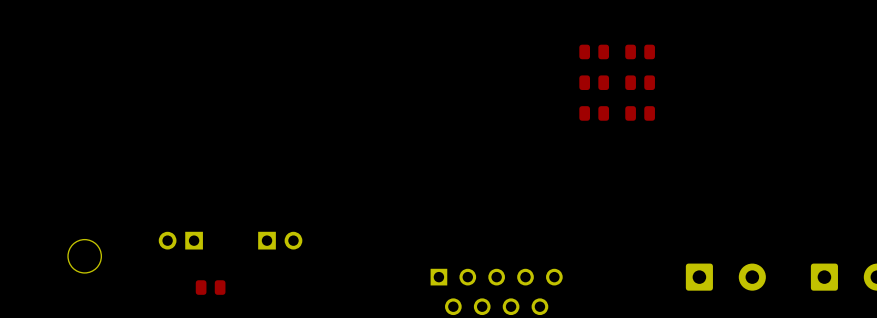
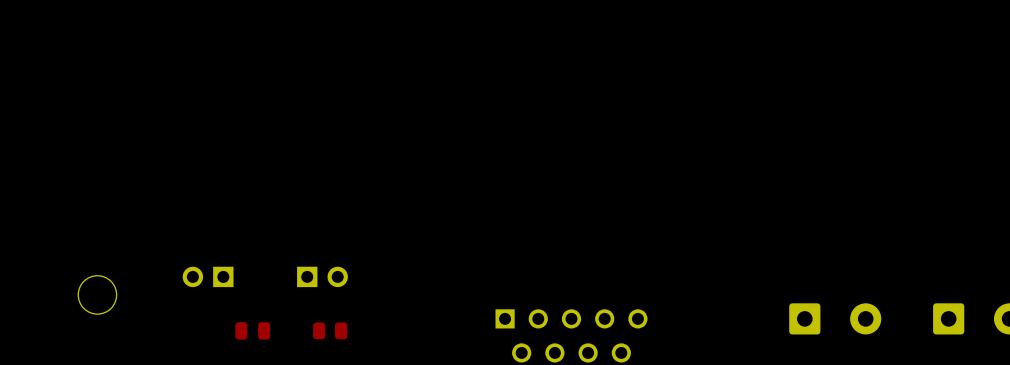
part: (594, 51) -> none
part: (640, 51) -> none
part: (594, 82) -> none
part: (640, 82) -> none
part: (594, 113) -> none
part: (640, 113) -> none
part footprint: [195, 280, 226, 295] -> [235, 322, 271, 340]
part: none -> (330, 330)

